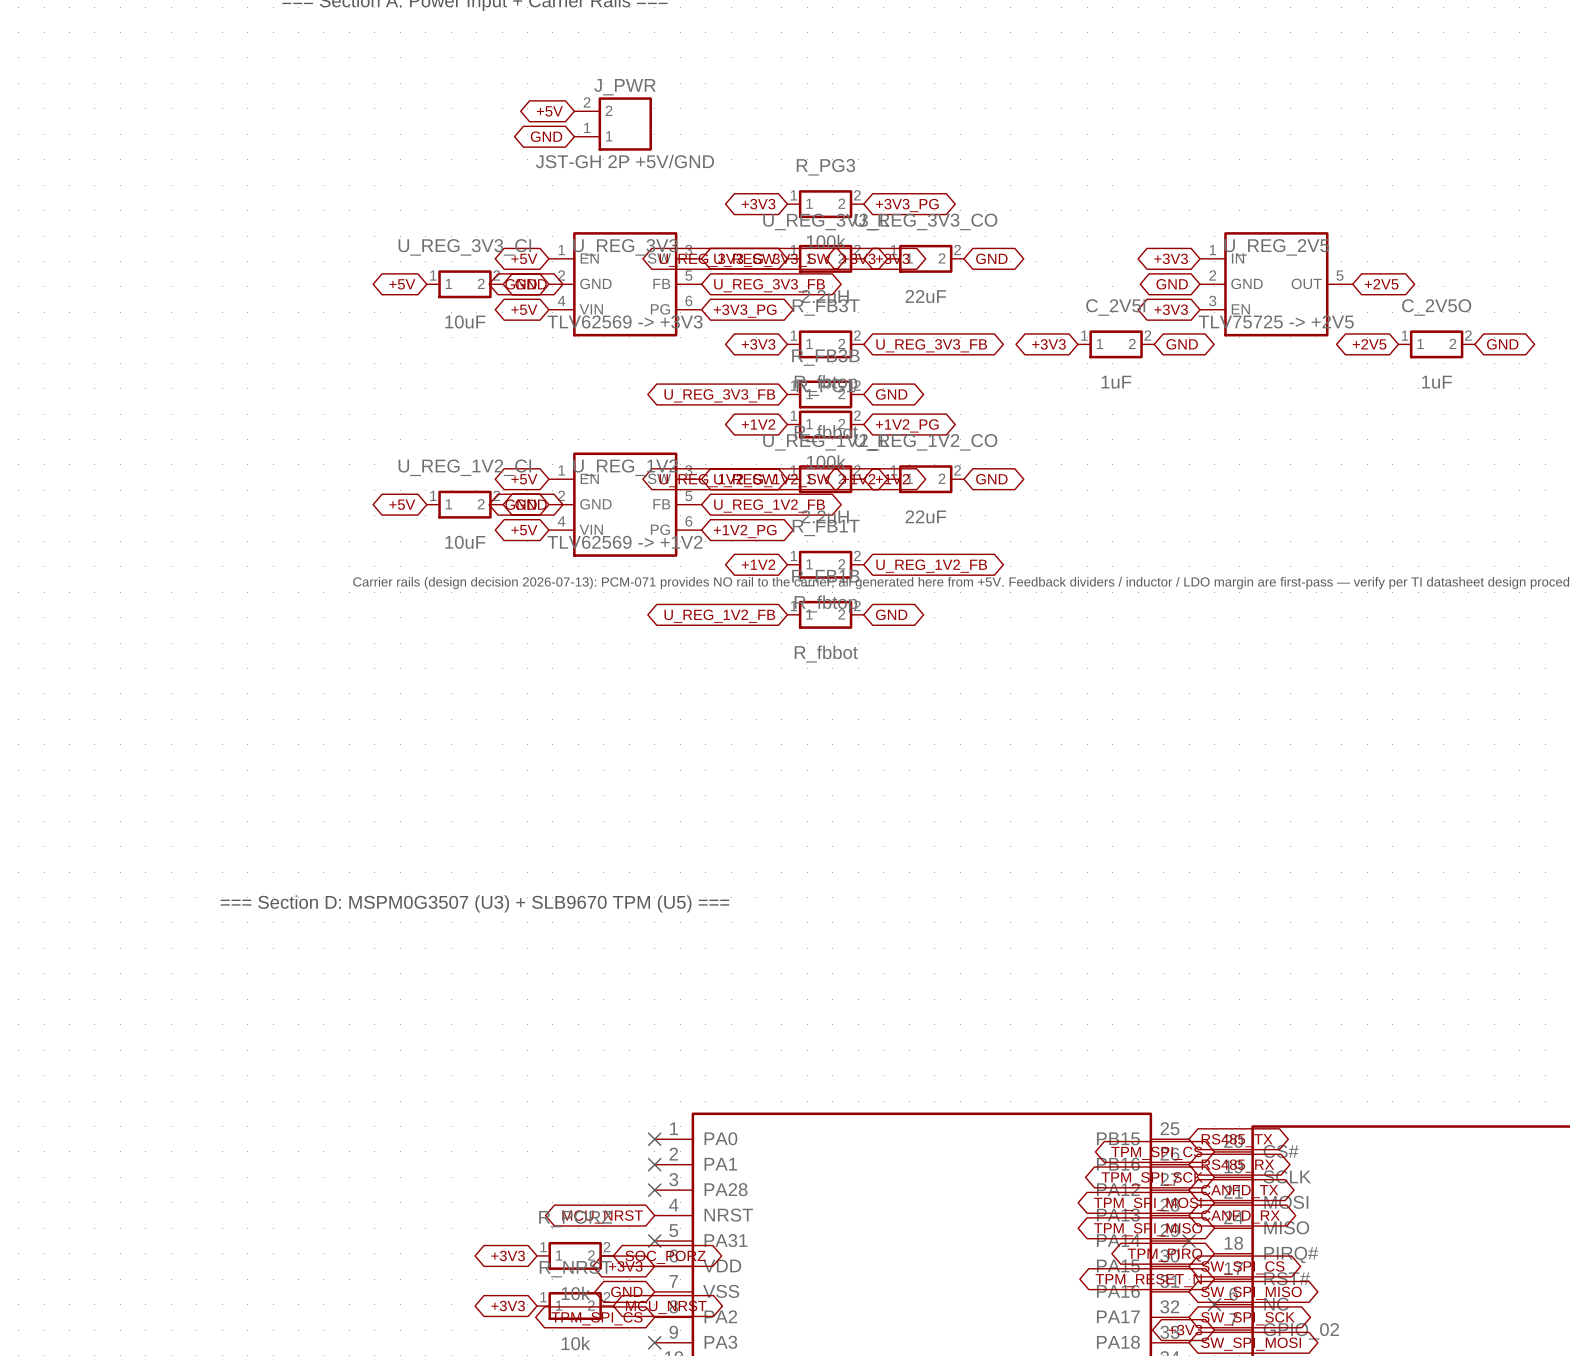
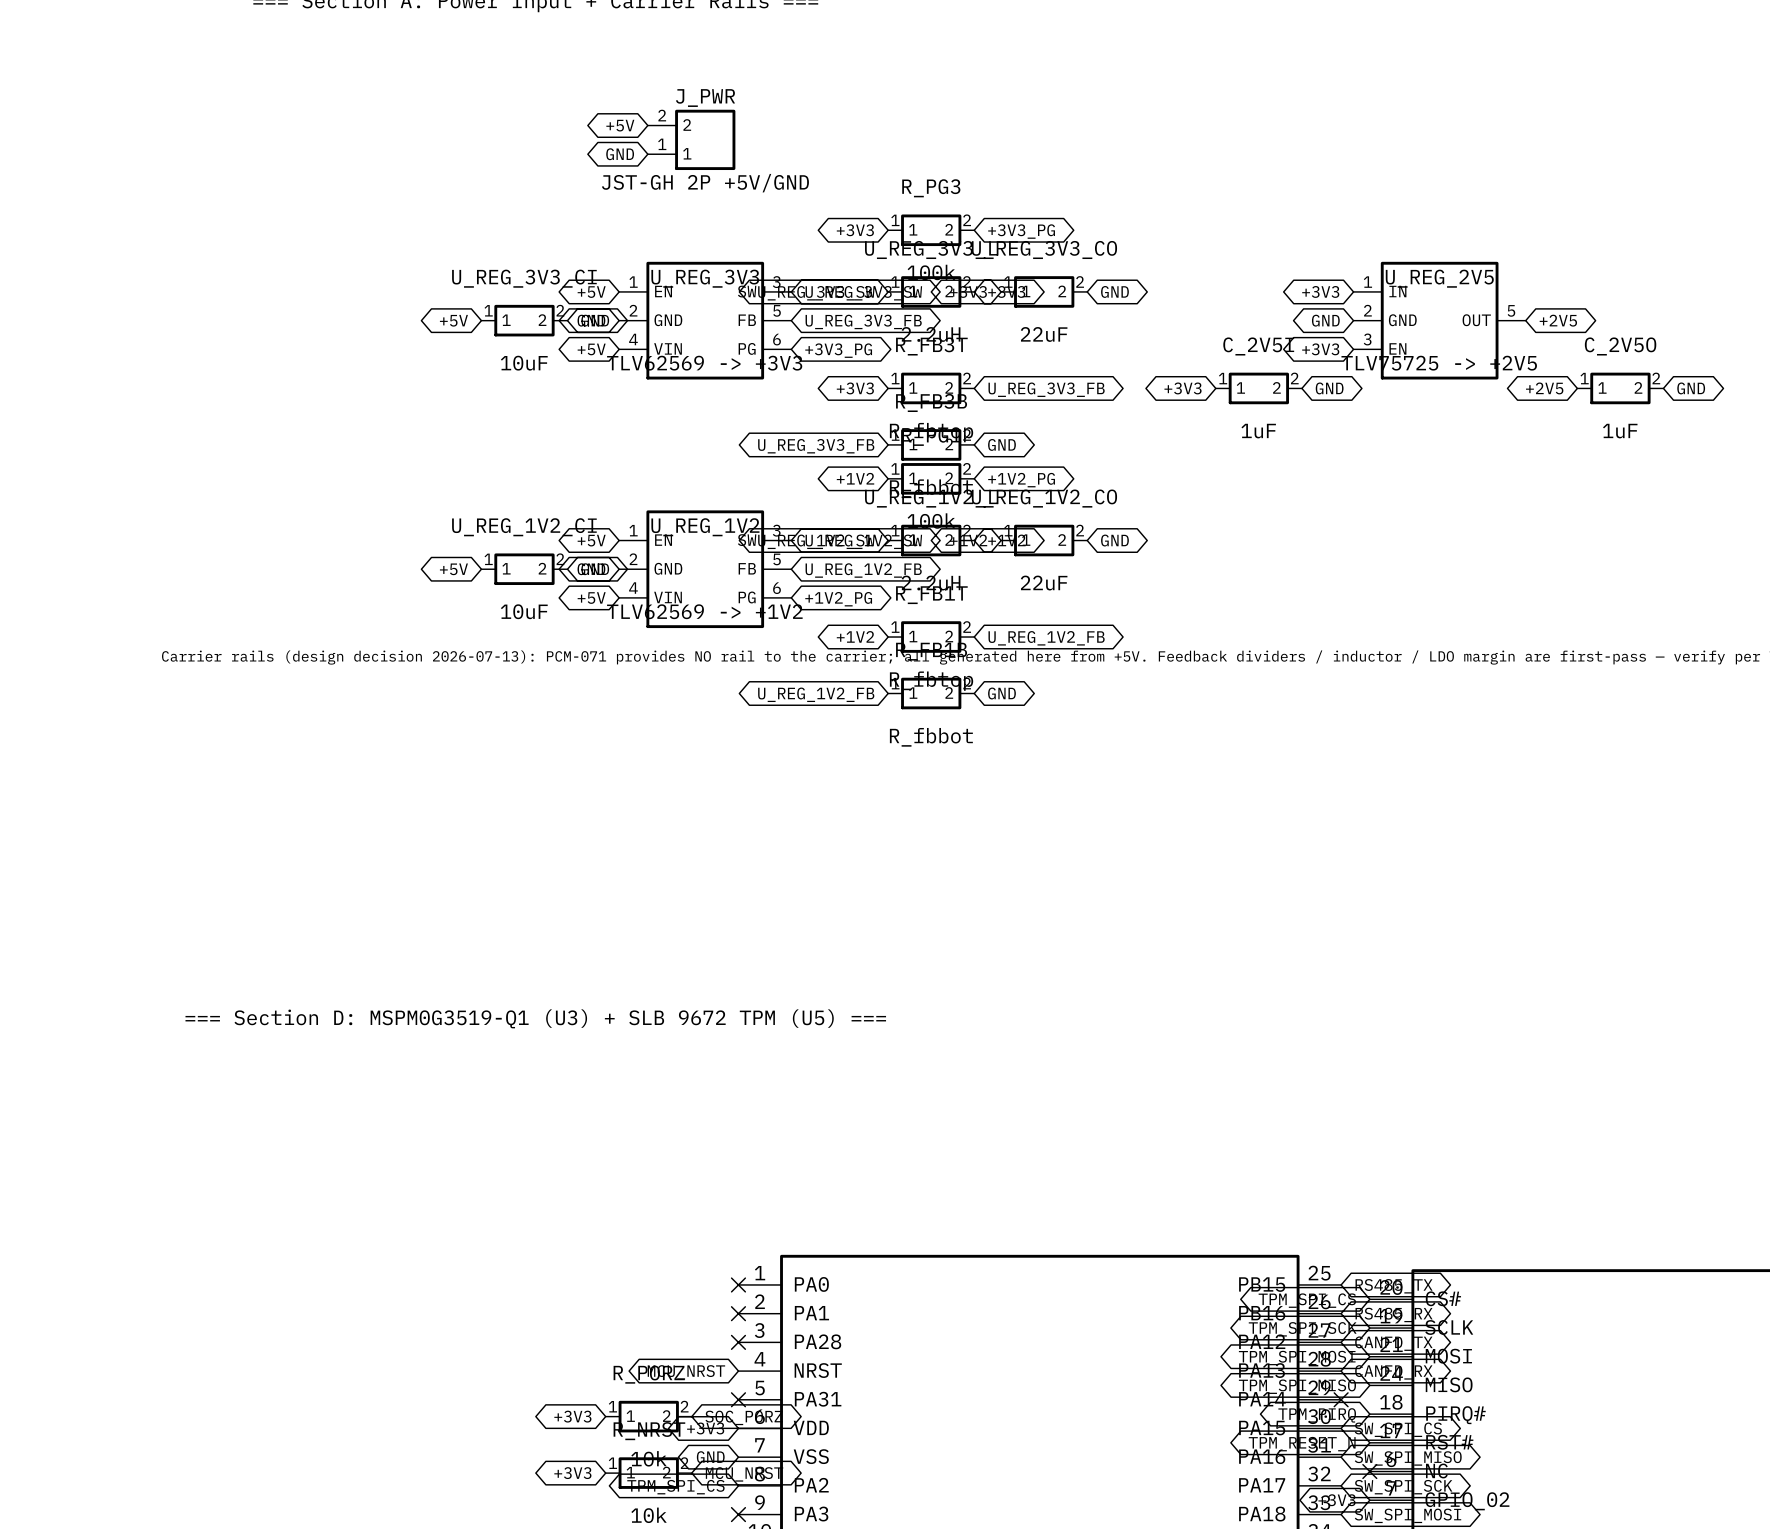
text: === Section D: MSPM0G3507 (U3) + SLB9670 TPM (U5) === (475, 903) -> === Section D: MSPM0G3519-Q1 (U3) + SLB 9672 TPM (U5) === (535, 1018)

